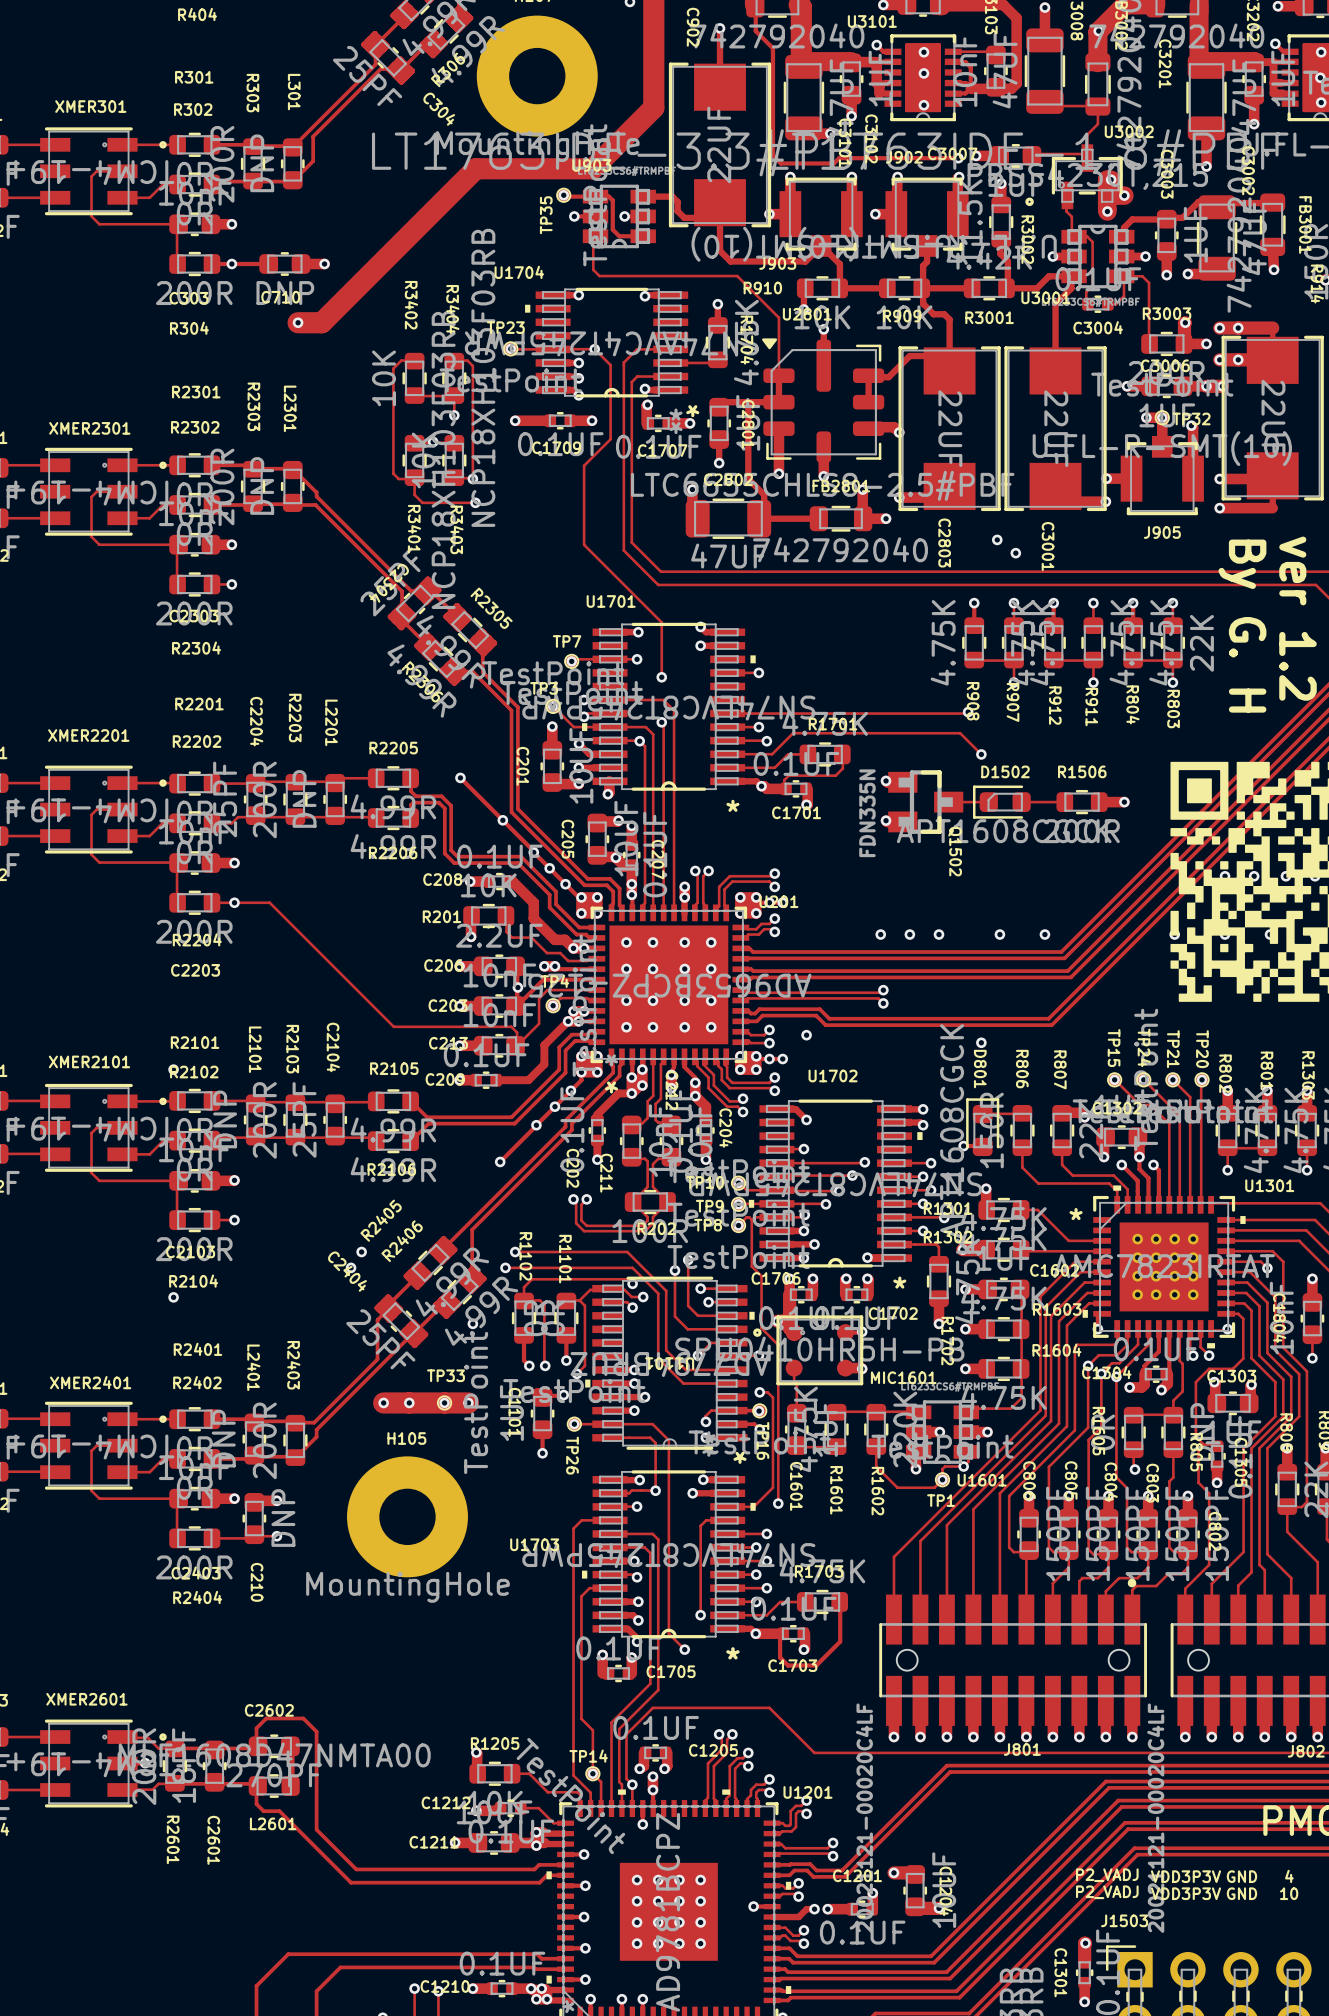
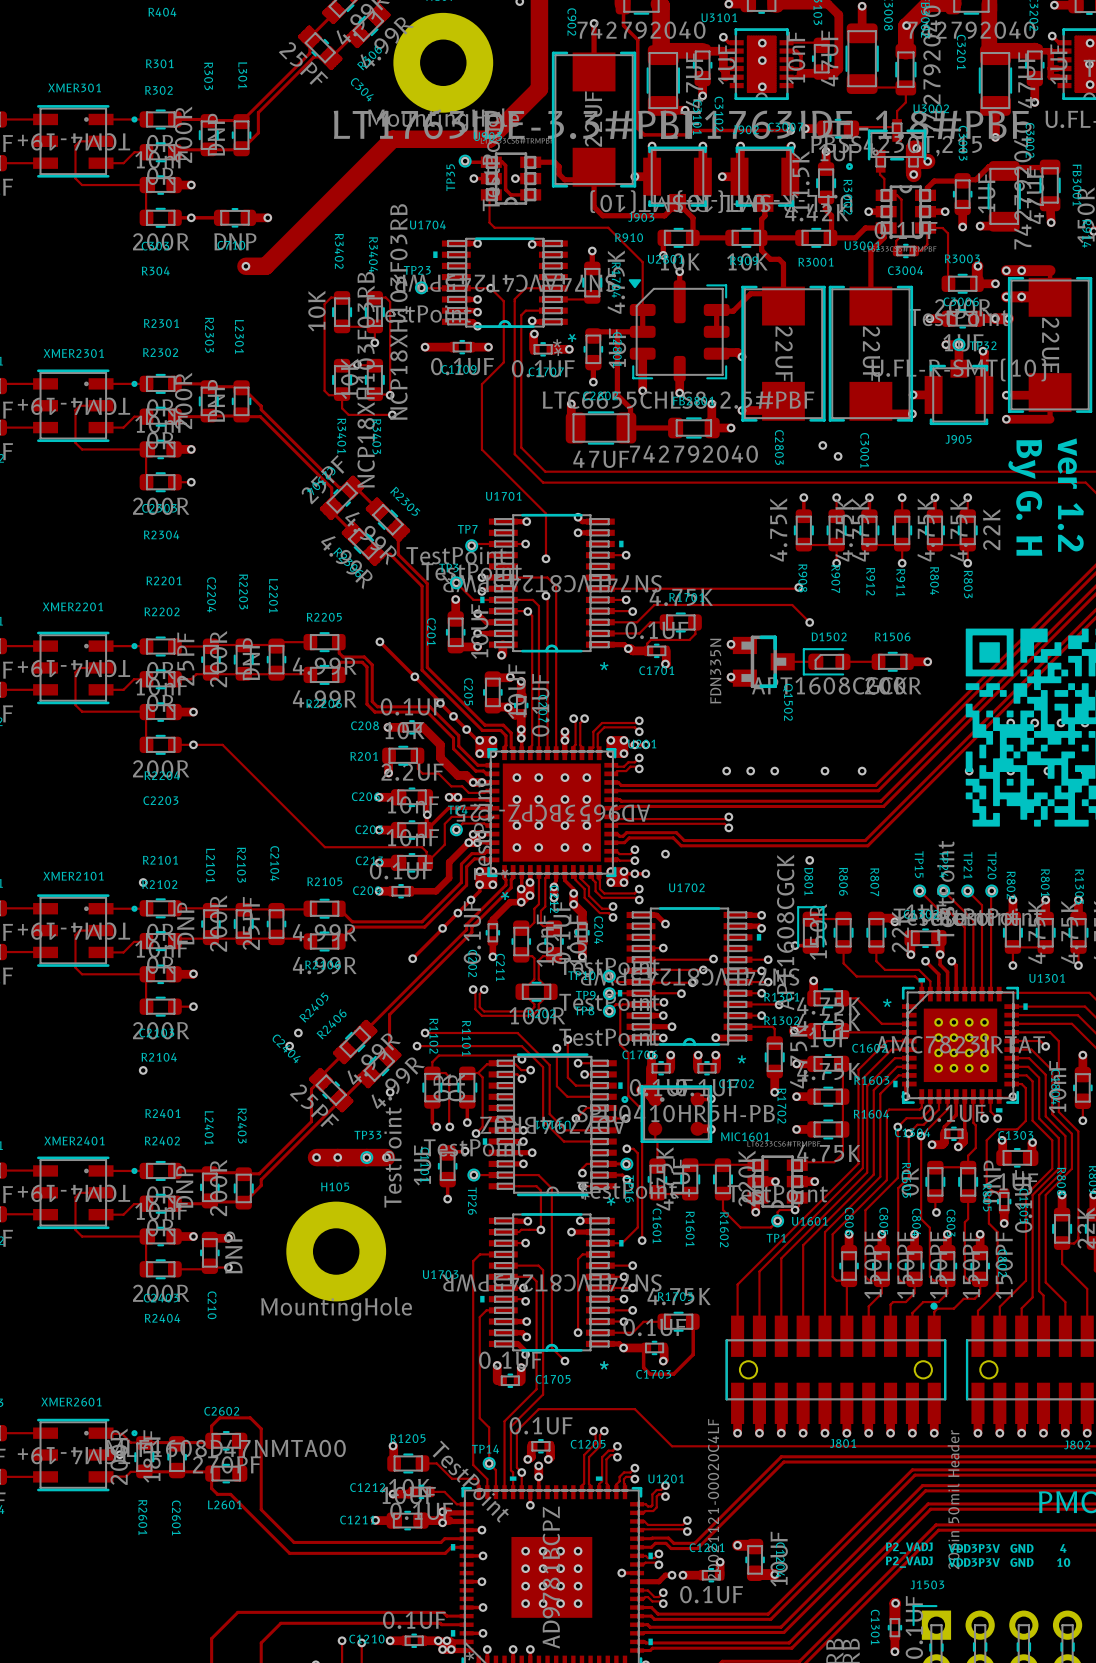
J802 value: 20021121-00020C4LF (1155, 1818) -> 20pin 50mil Header (955, 1499)

